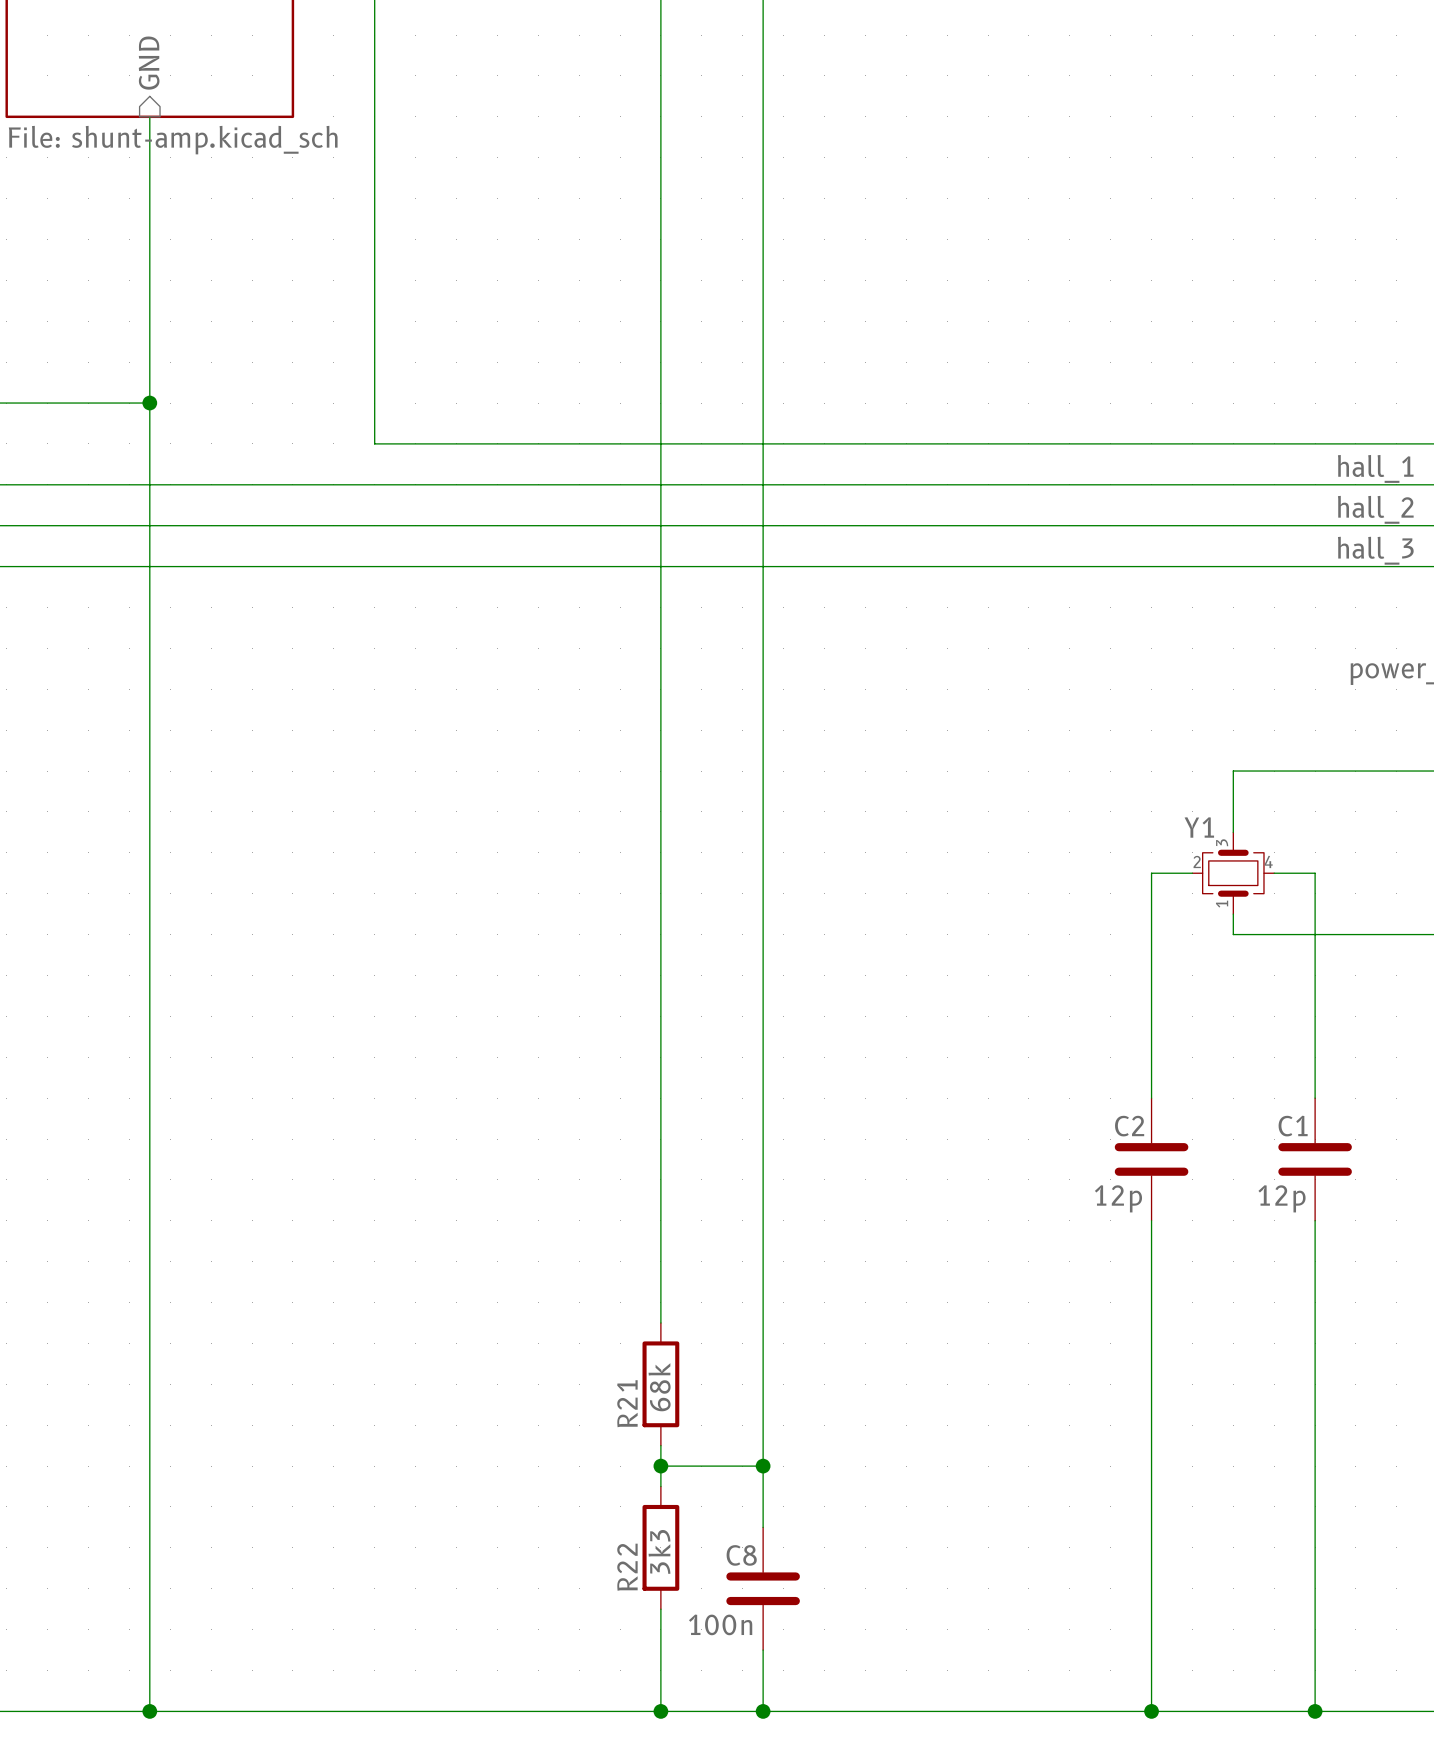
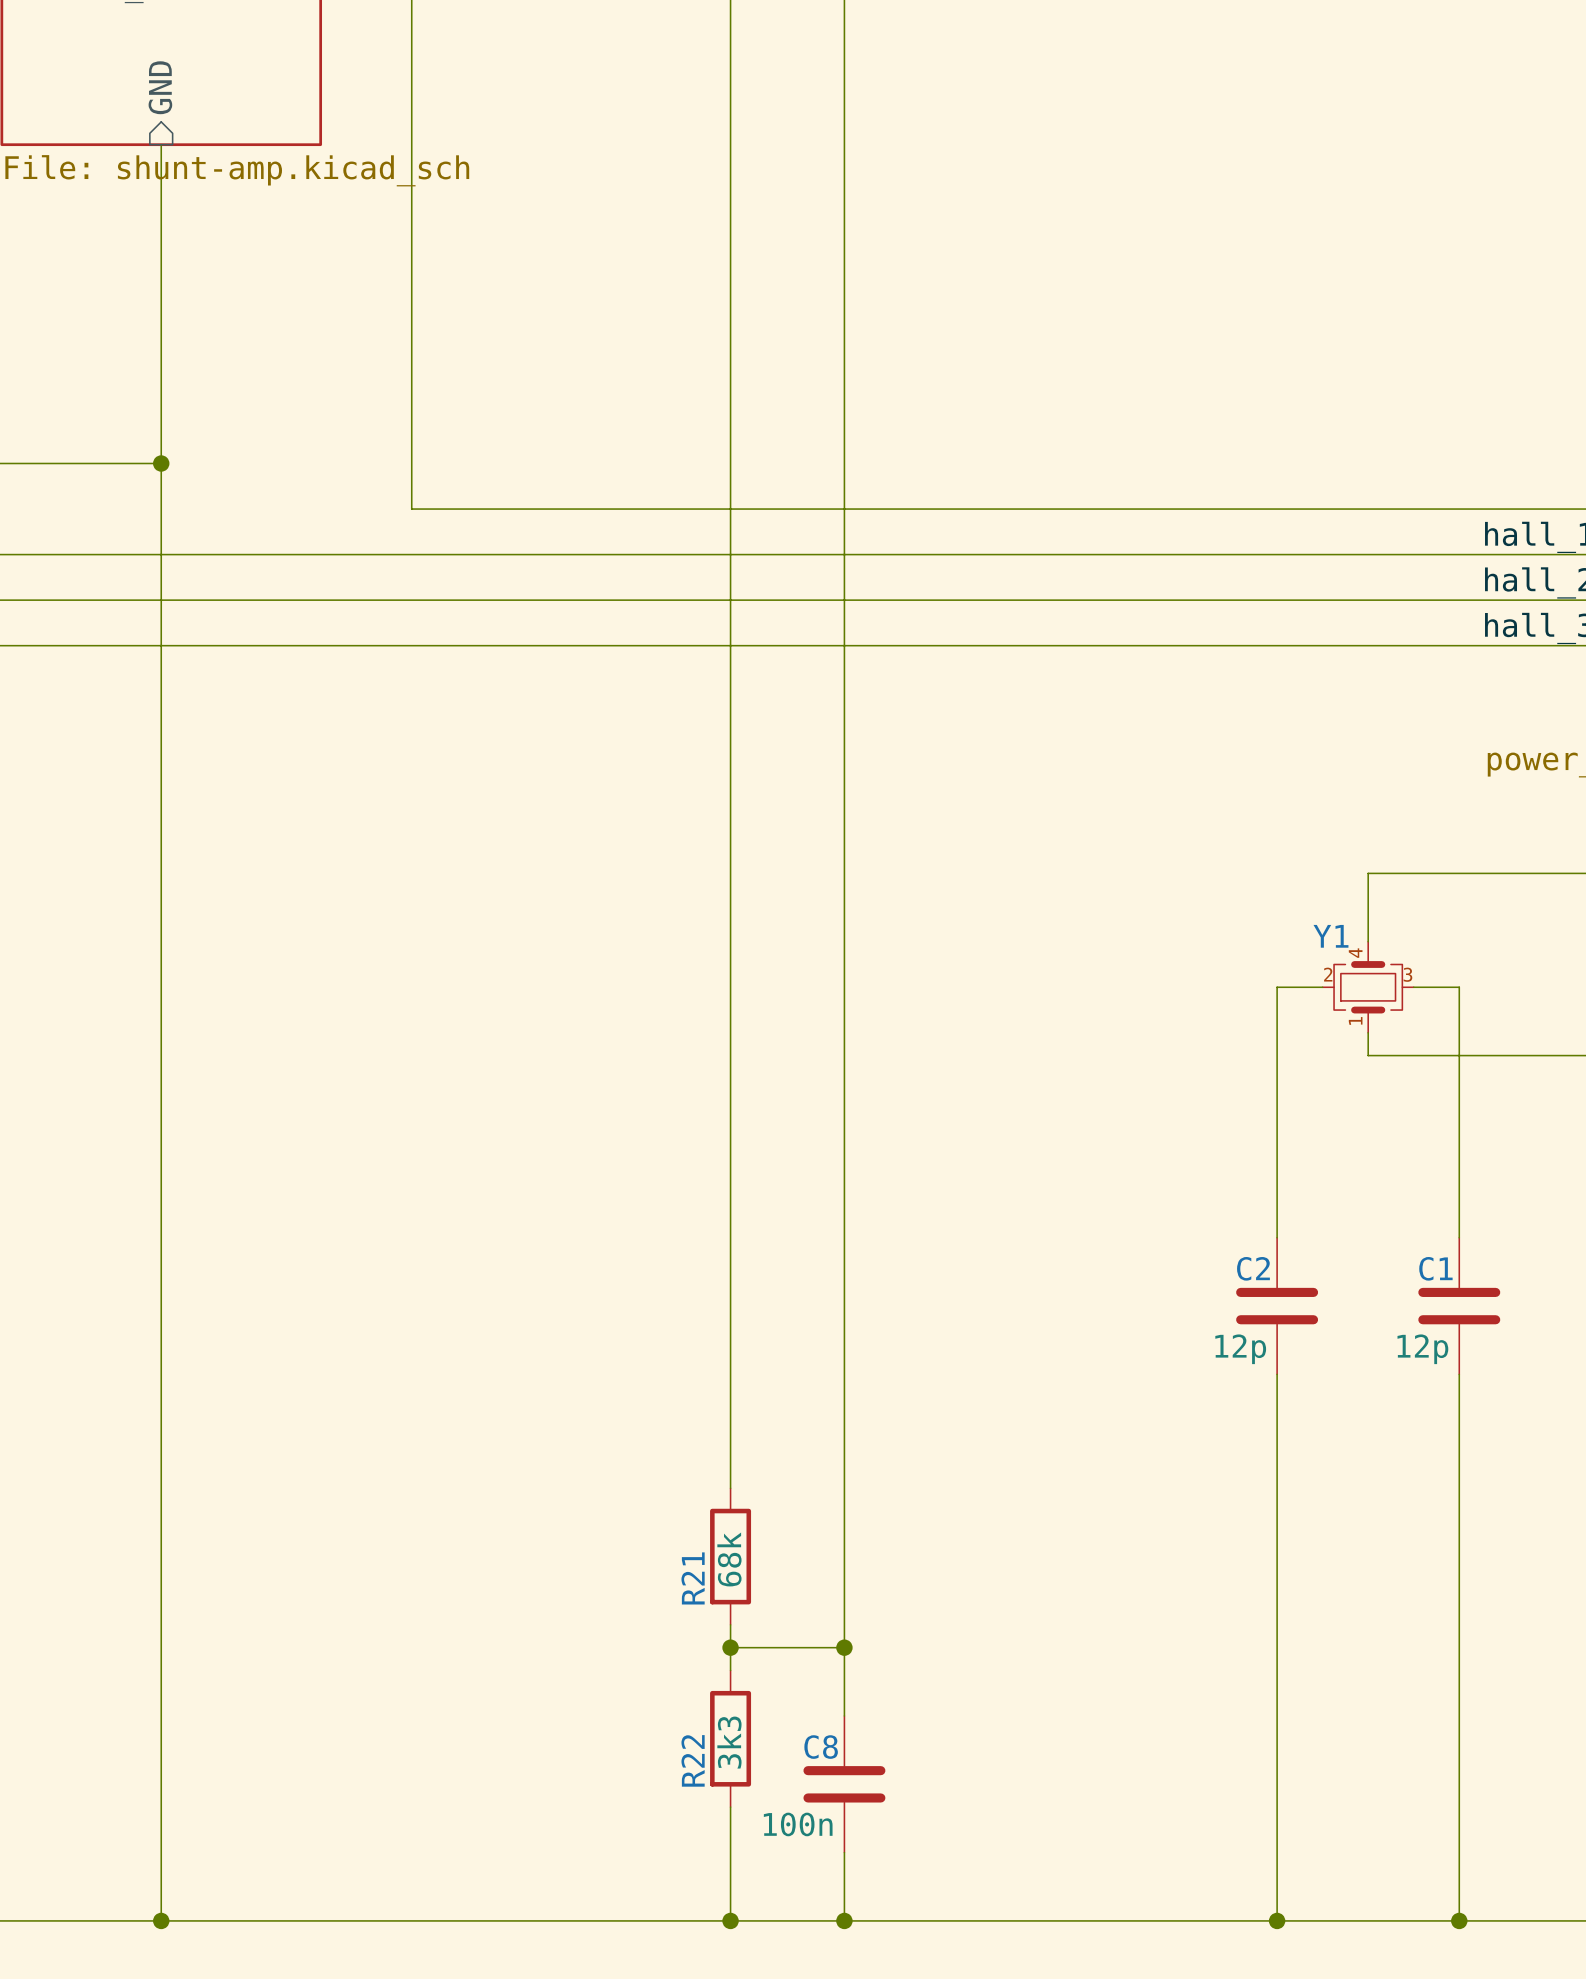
Y1 pin number: 3 (1222, 842) -> 4 (1355, 953)
Y1 pin number: 4 (1268, 861) -> 3 (1407, 974)

